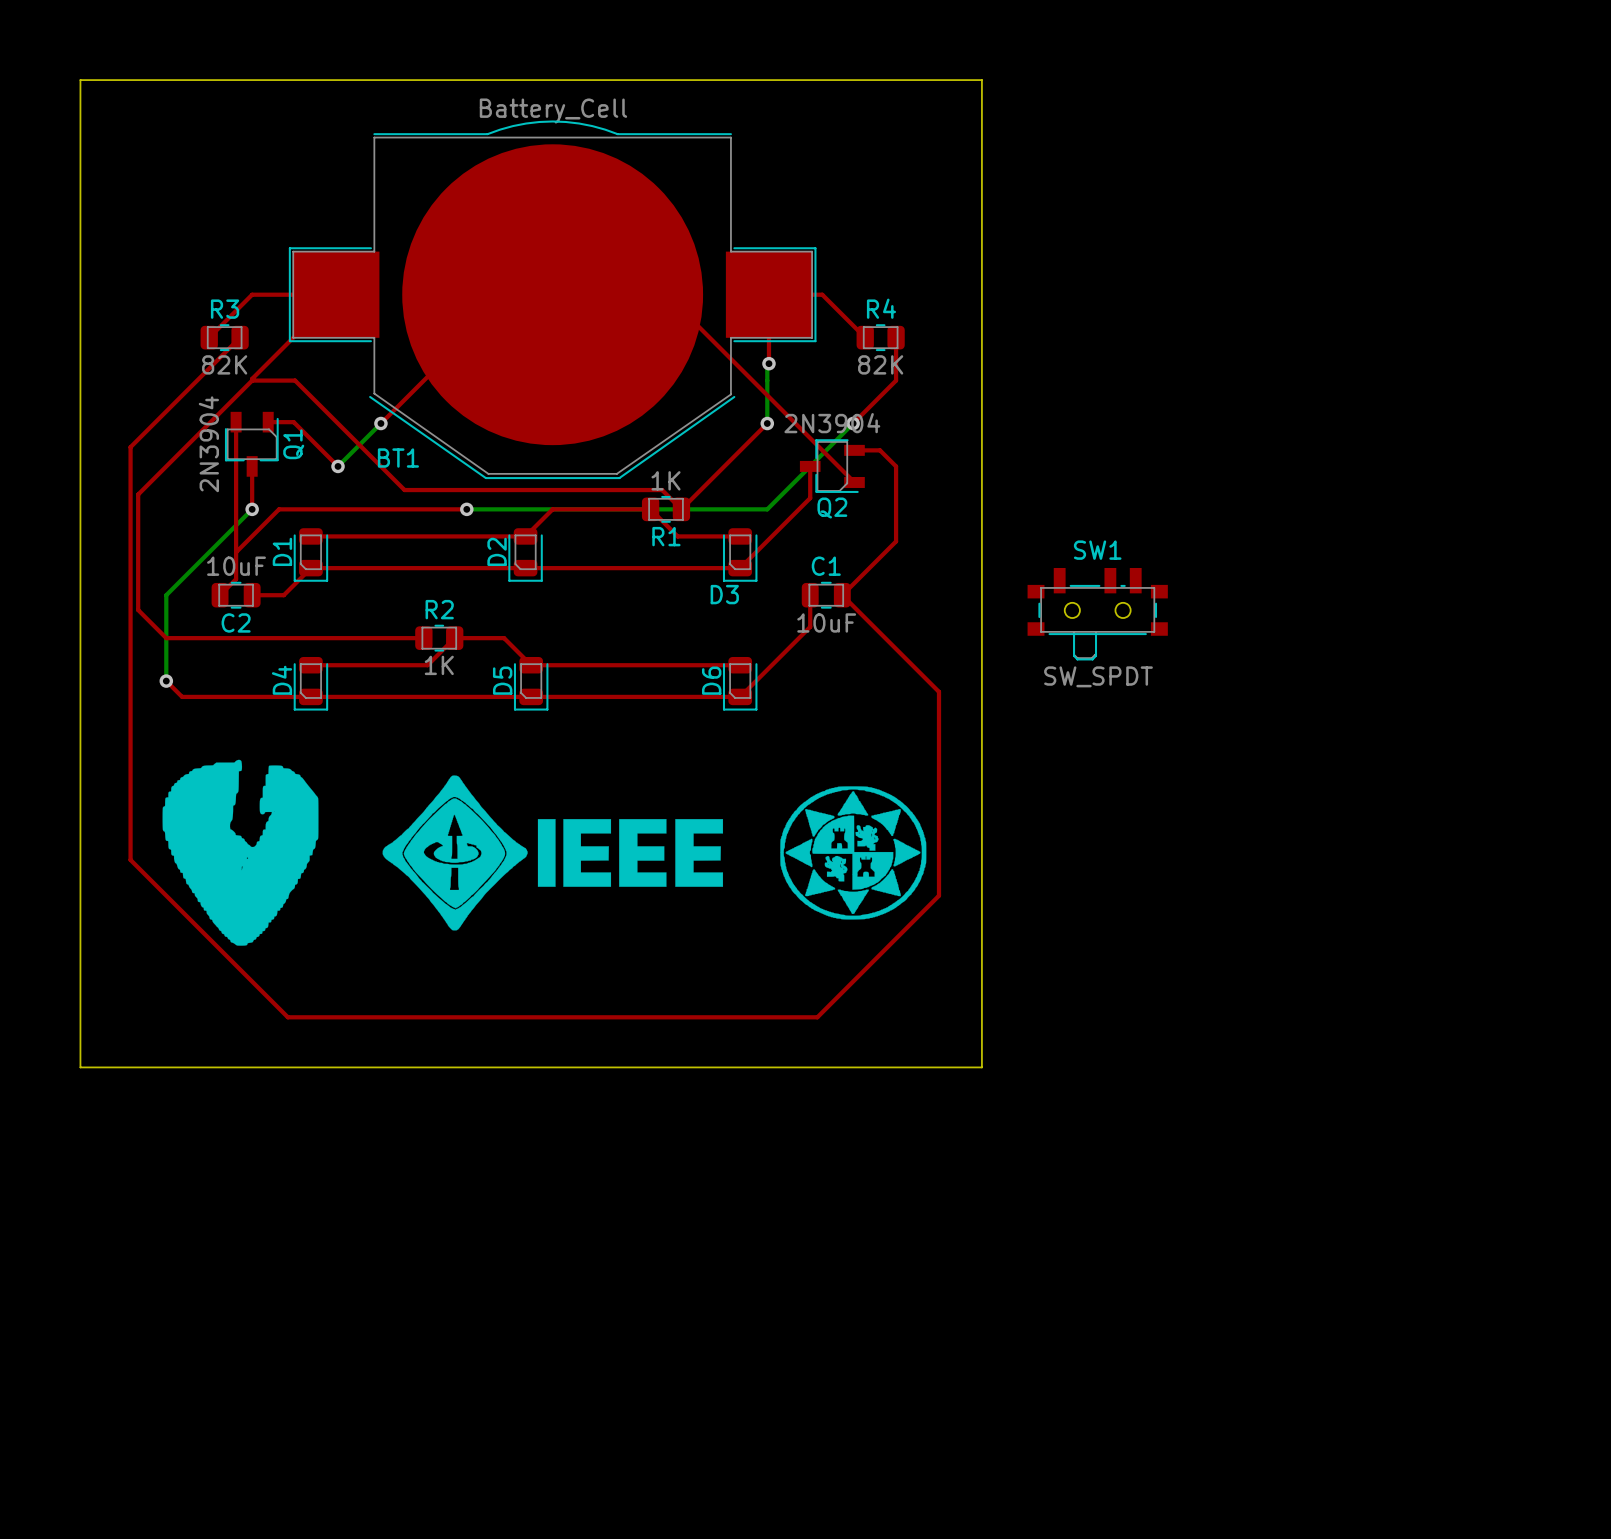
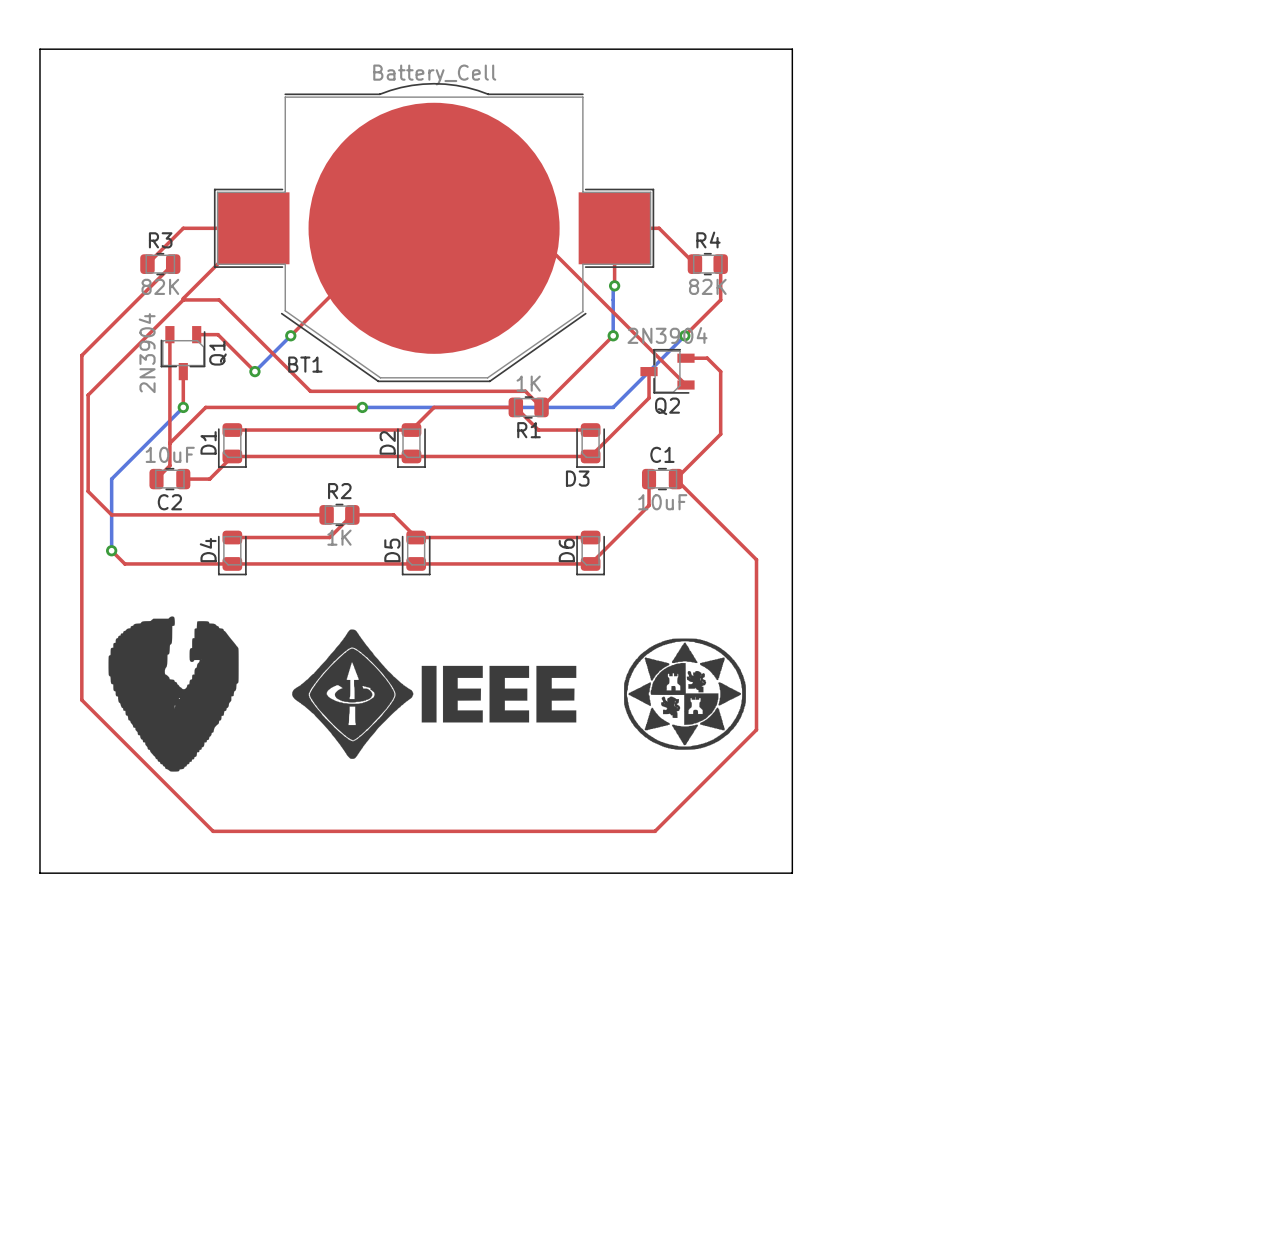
SW1: SW_SPDT (1097, 614) -> none

